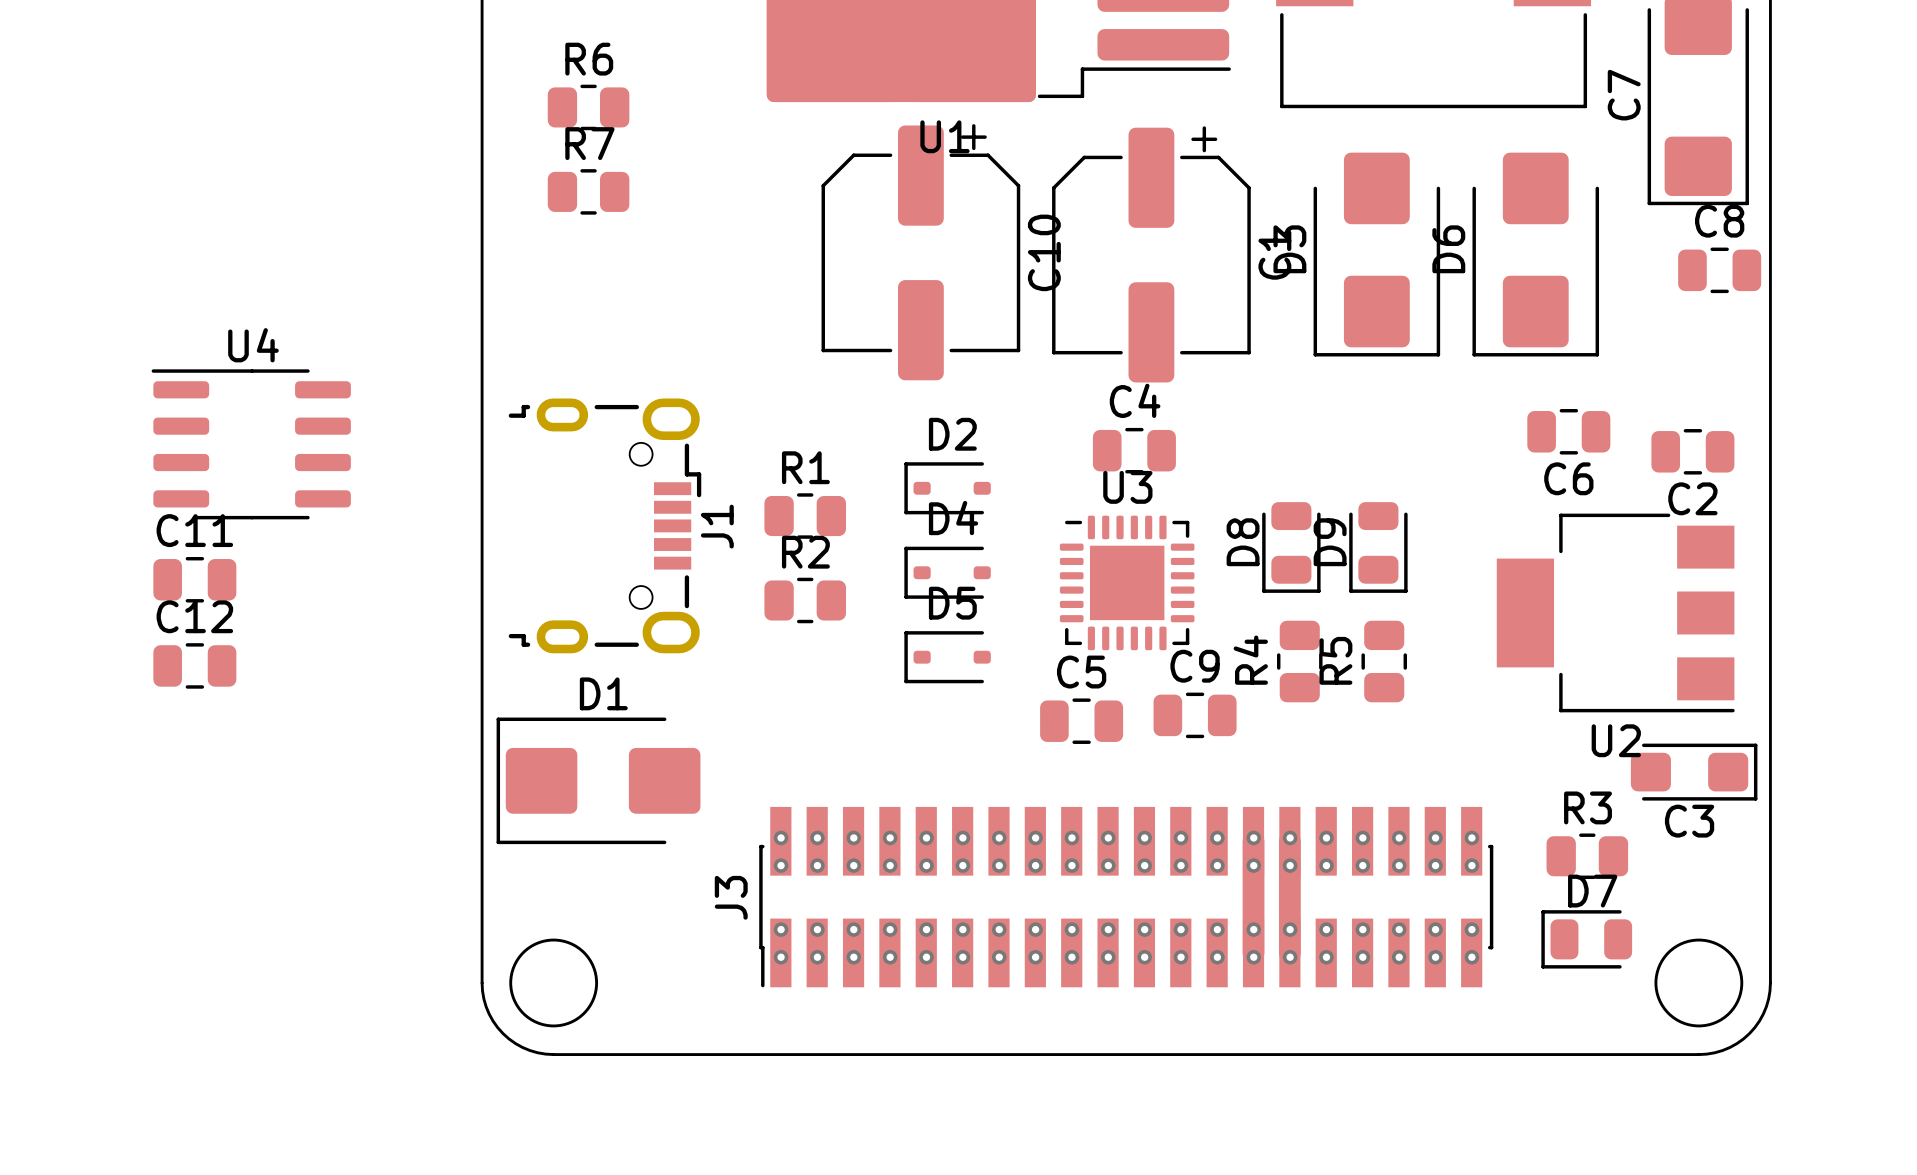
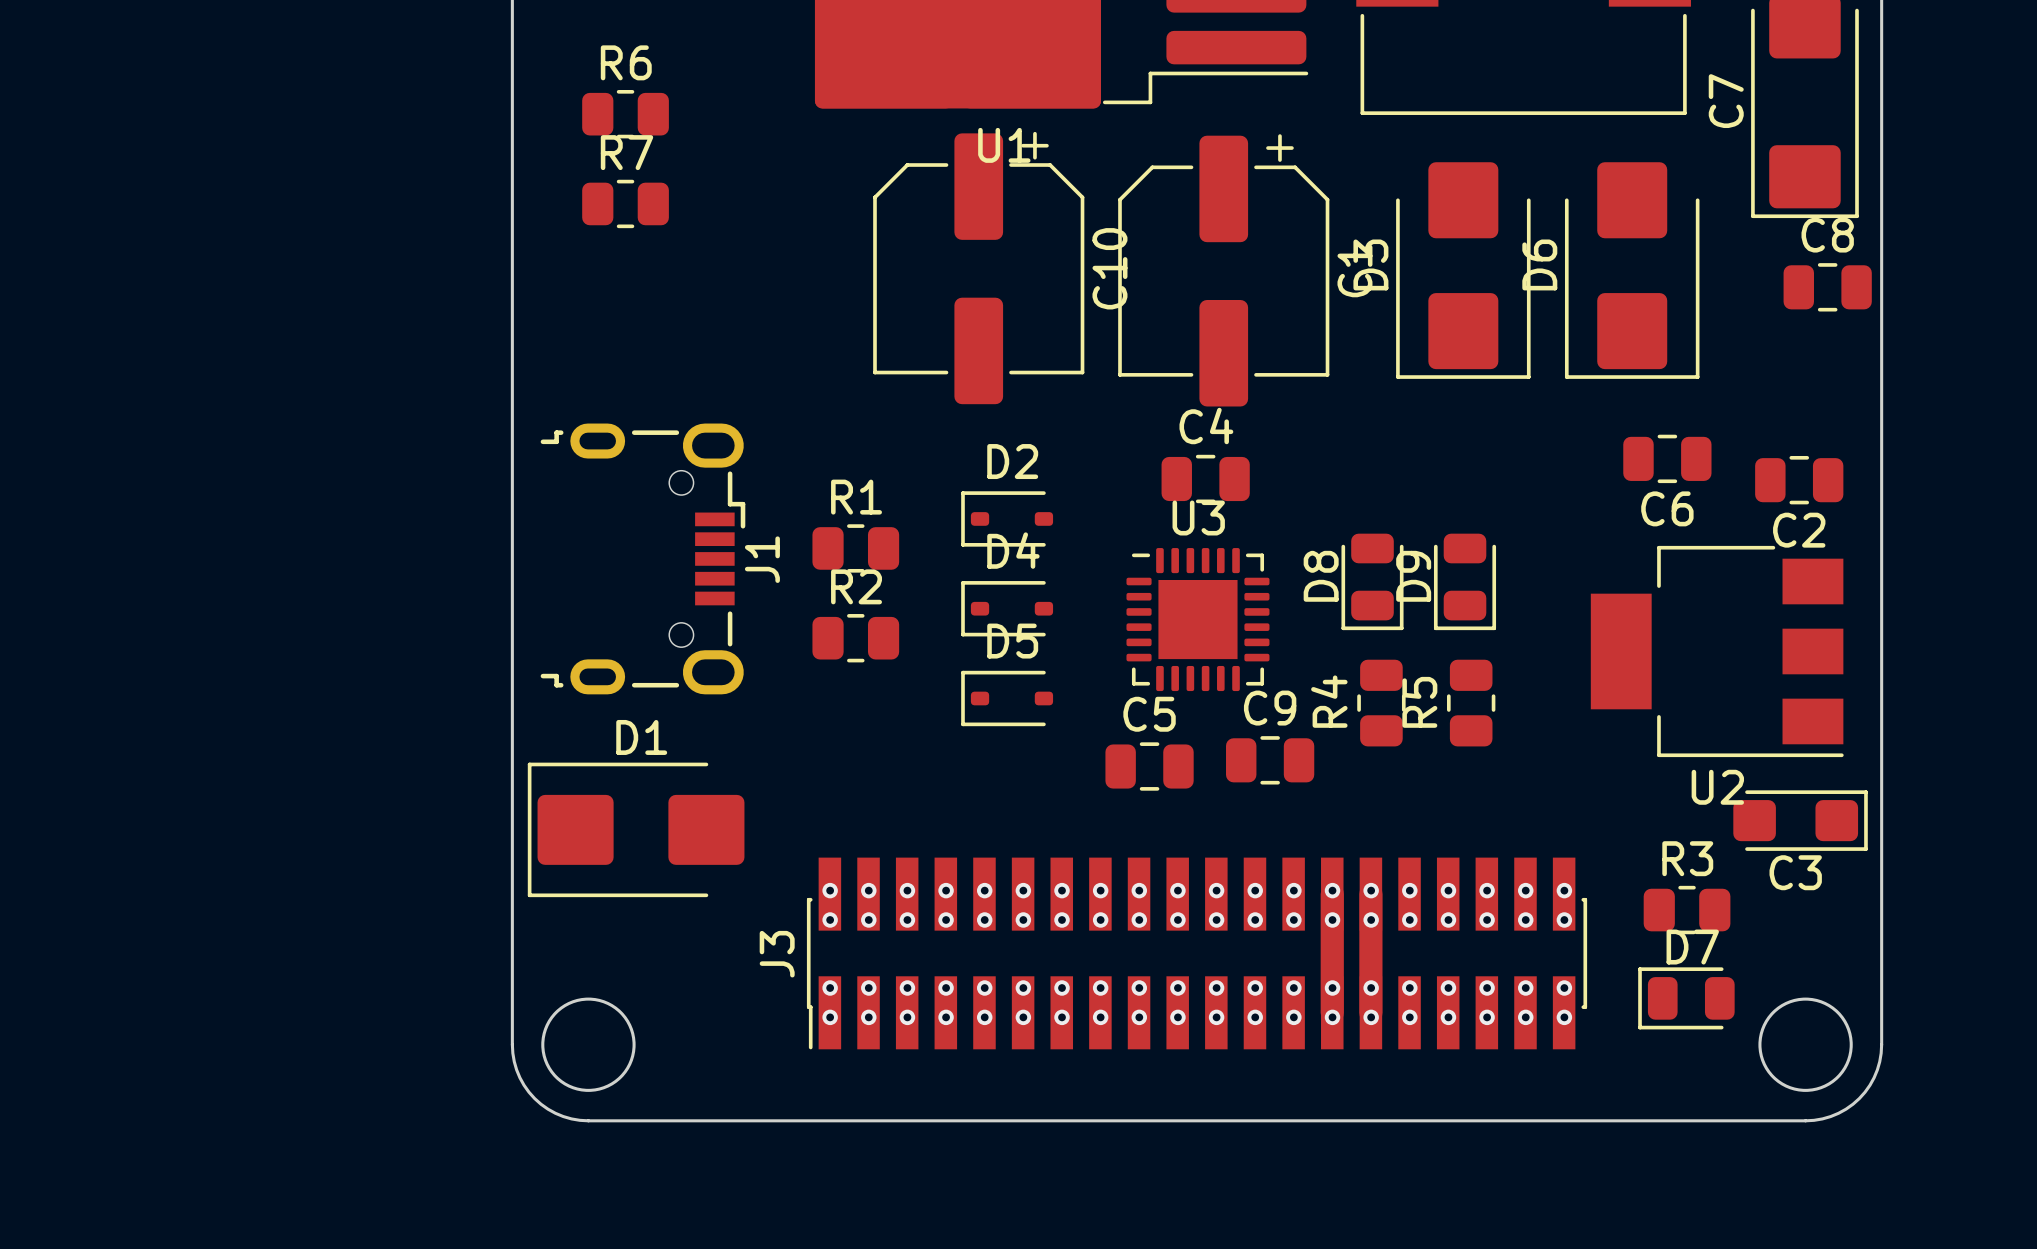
U4: (251, 444) -> none
C11: (194, 579) -> none
C12: (194, 665) -> none

